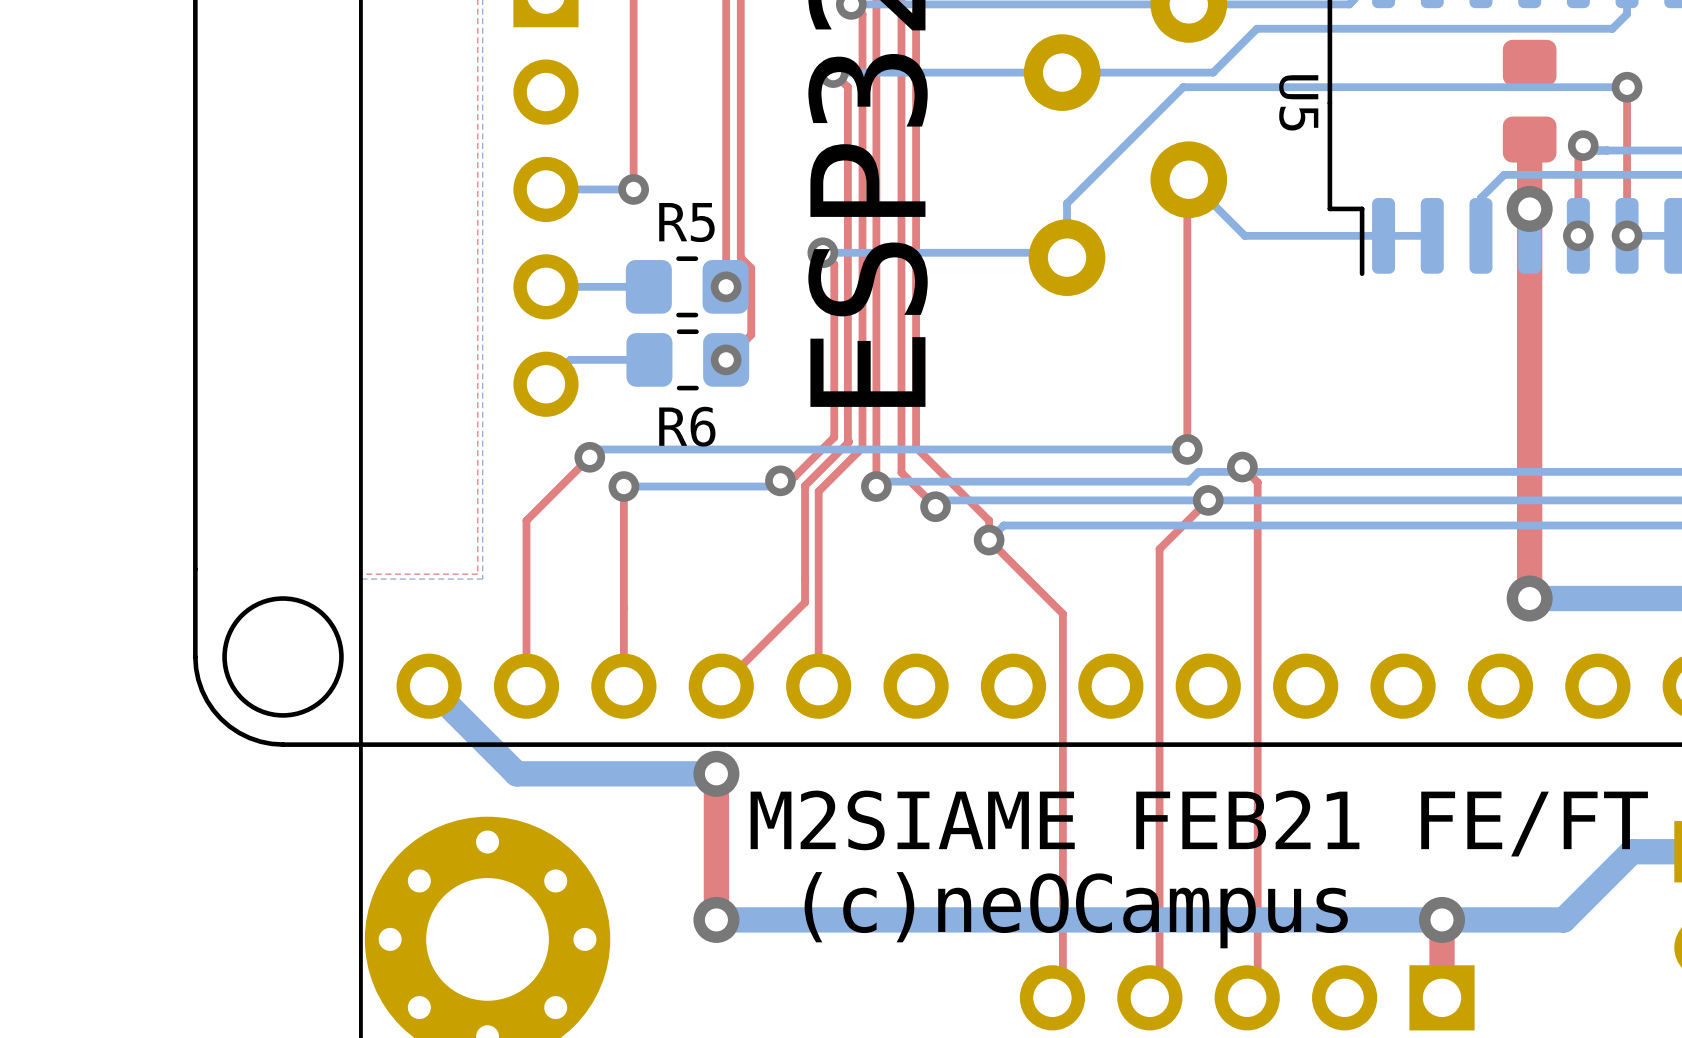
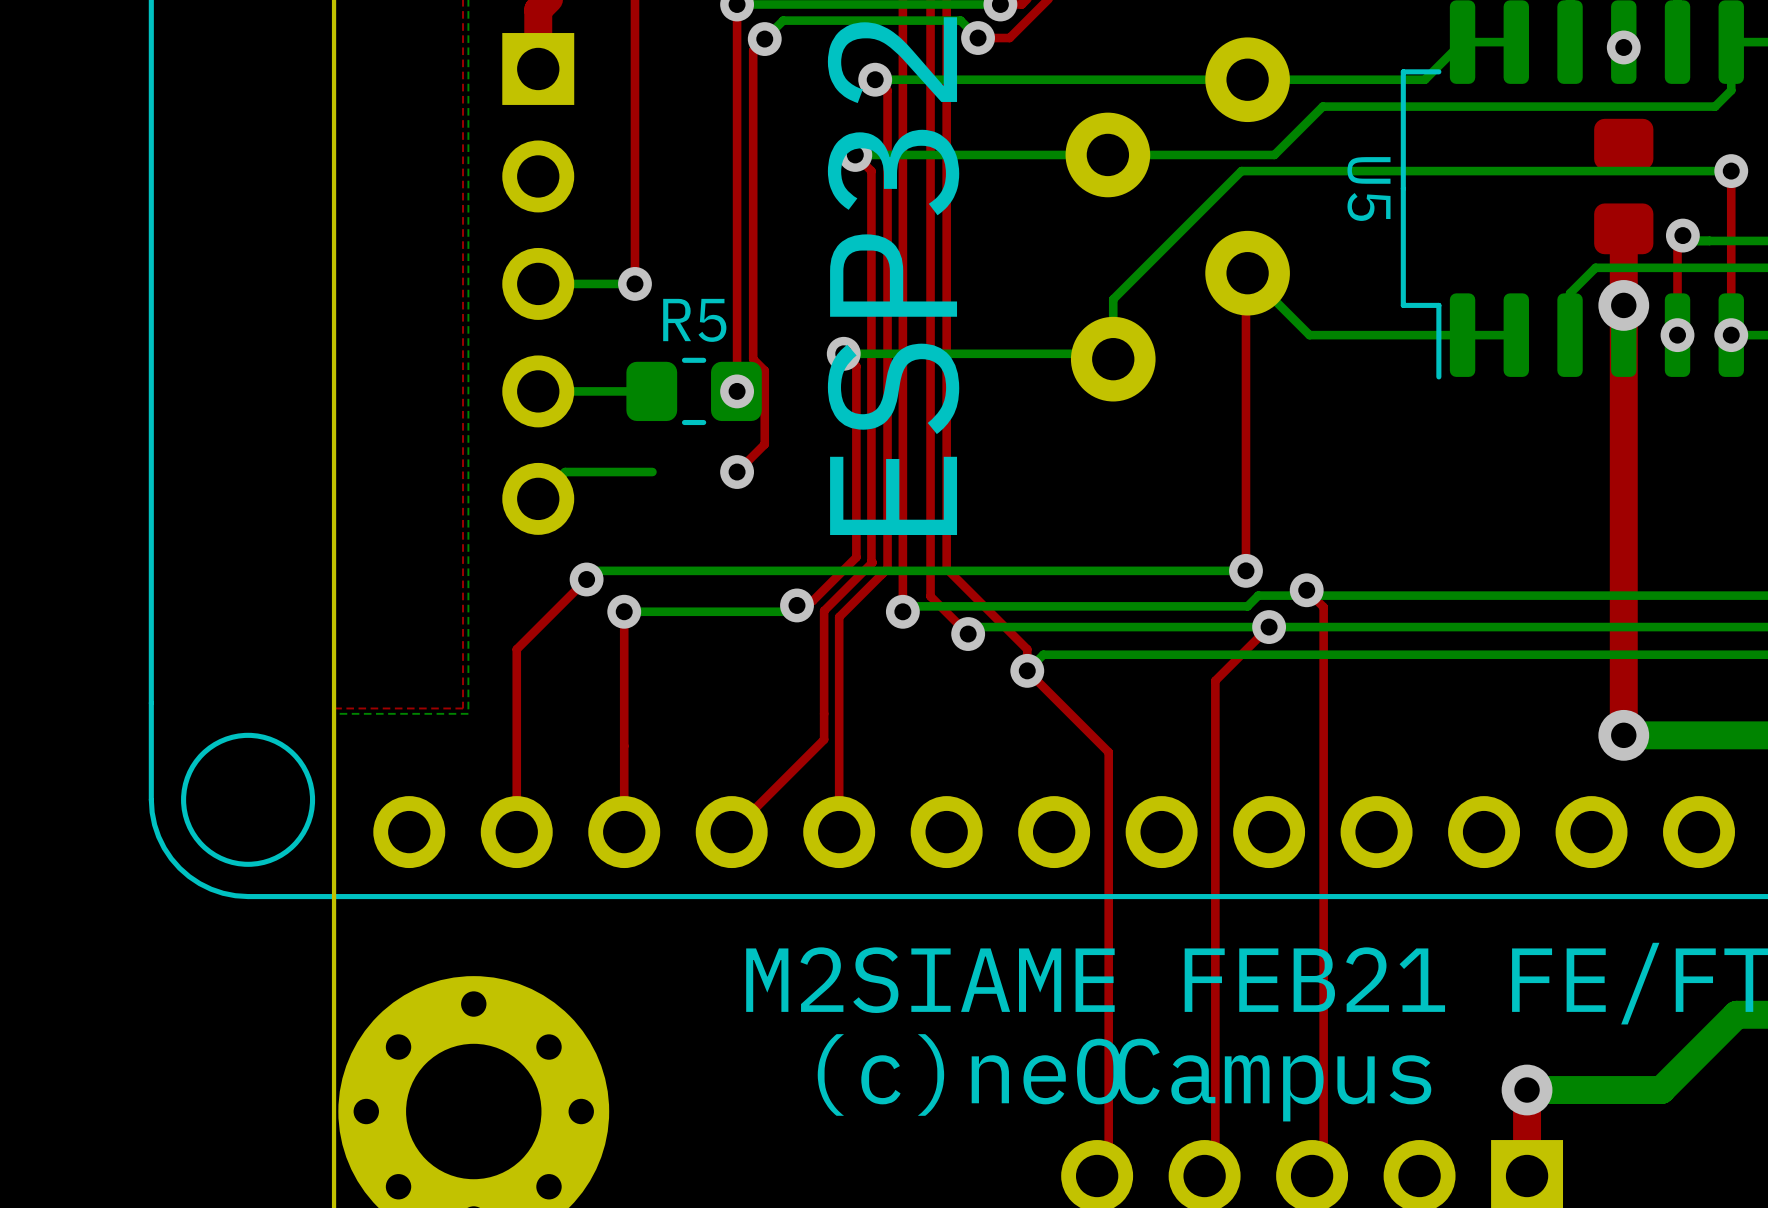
R6: (687, 359) -> none
bottom track: (429, 686) (516, 773) (716, 773) -> none
top track: (716, 773) (716, 919) -> none
via: (716, 773) -> none
via: (716, 919) -> none
bottom track: (1442, 919) (716, 919) -> none

